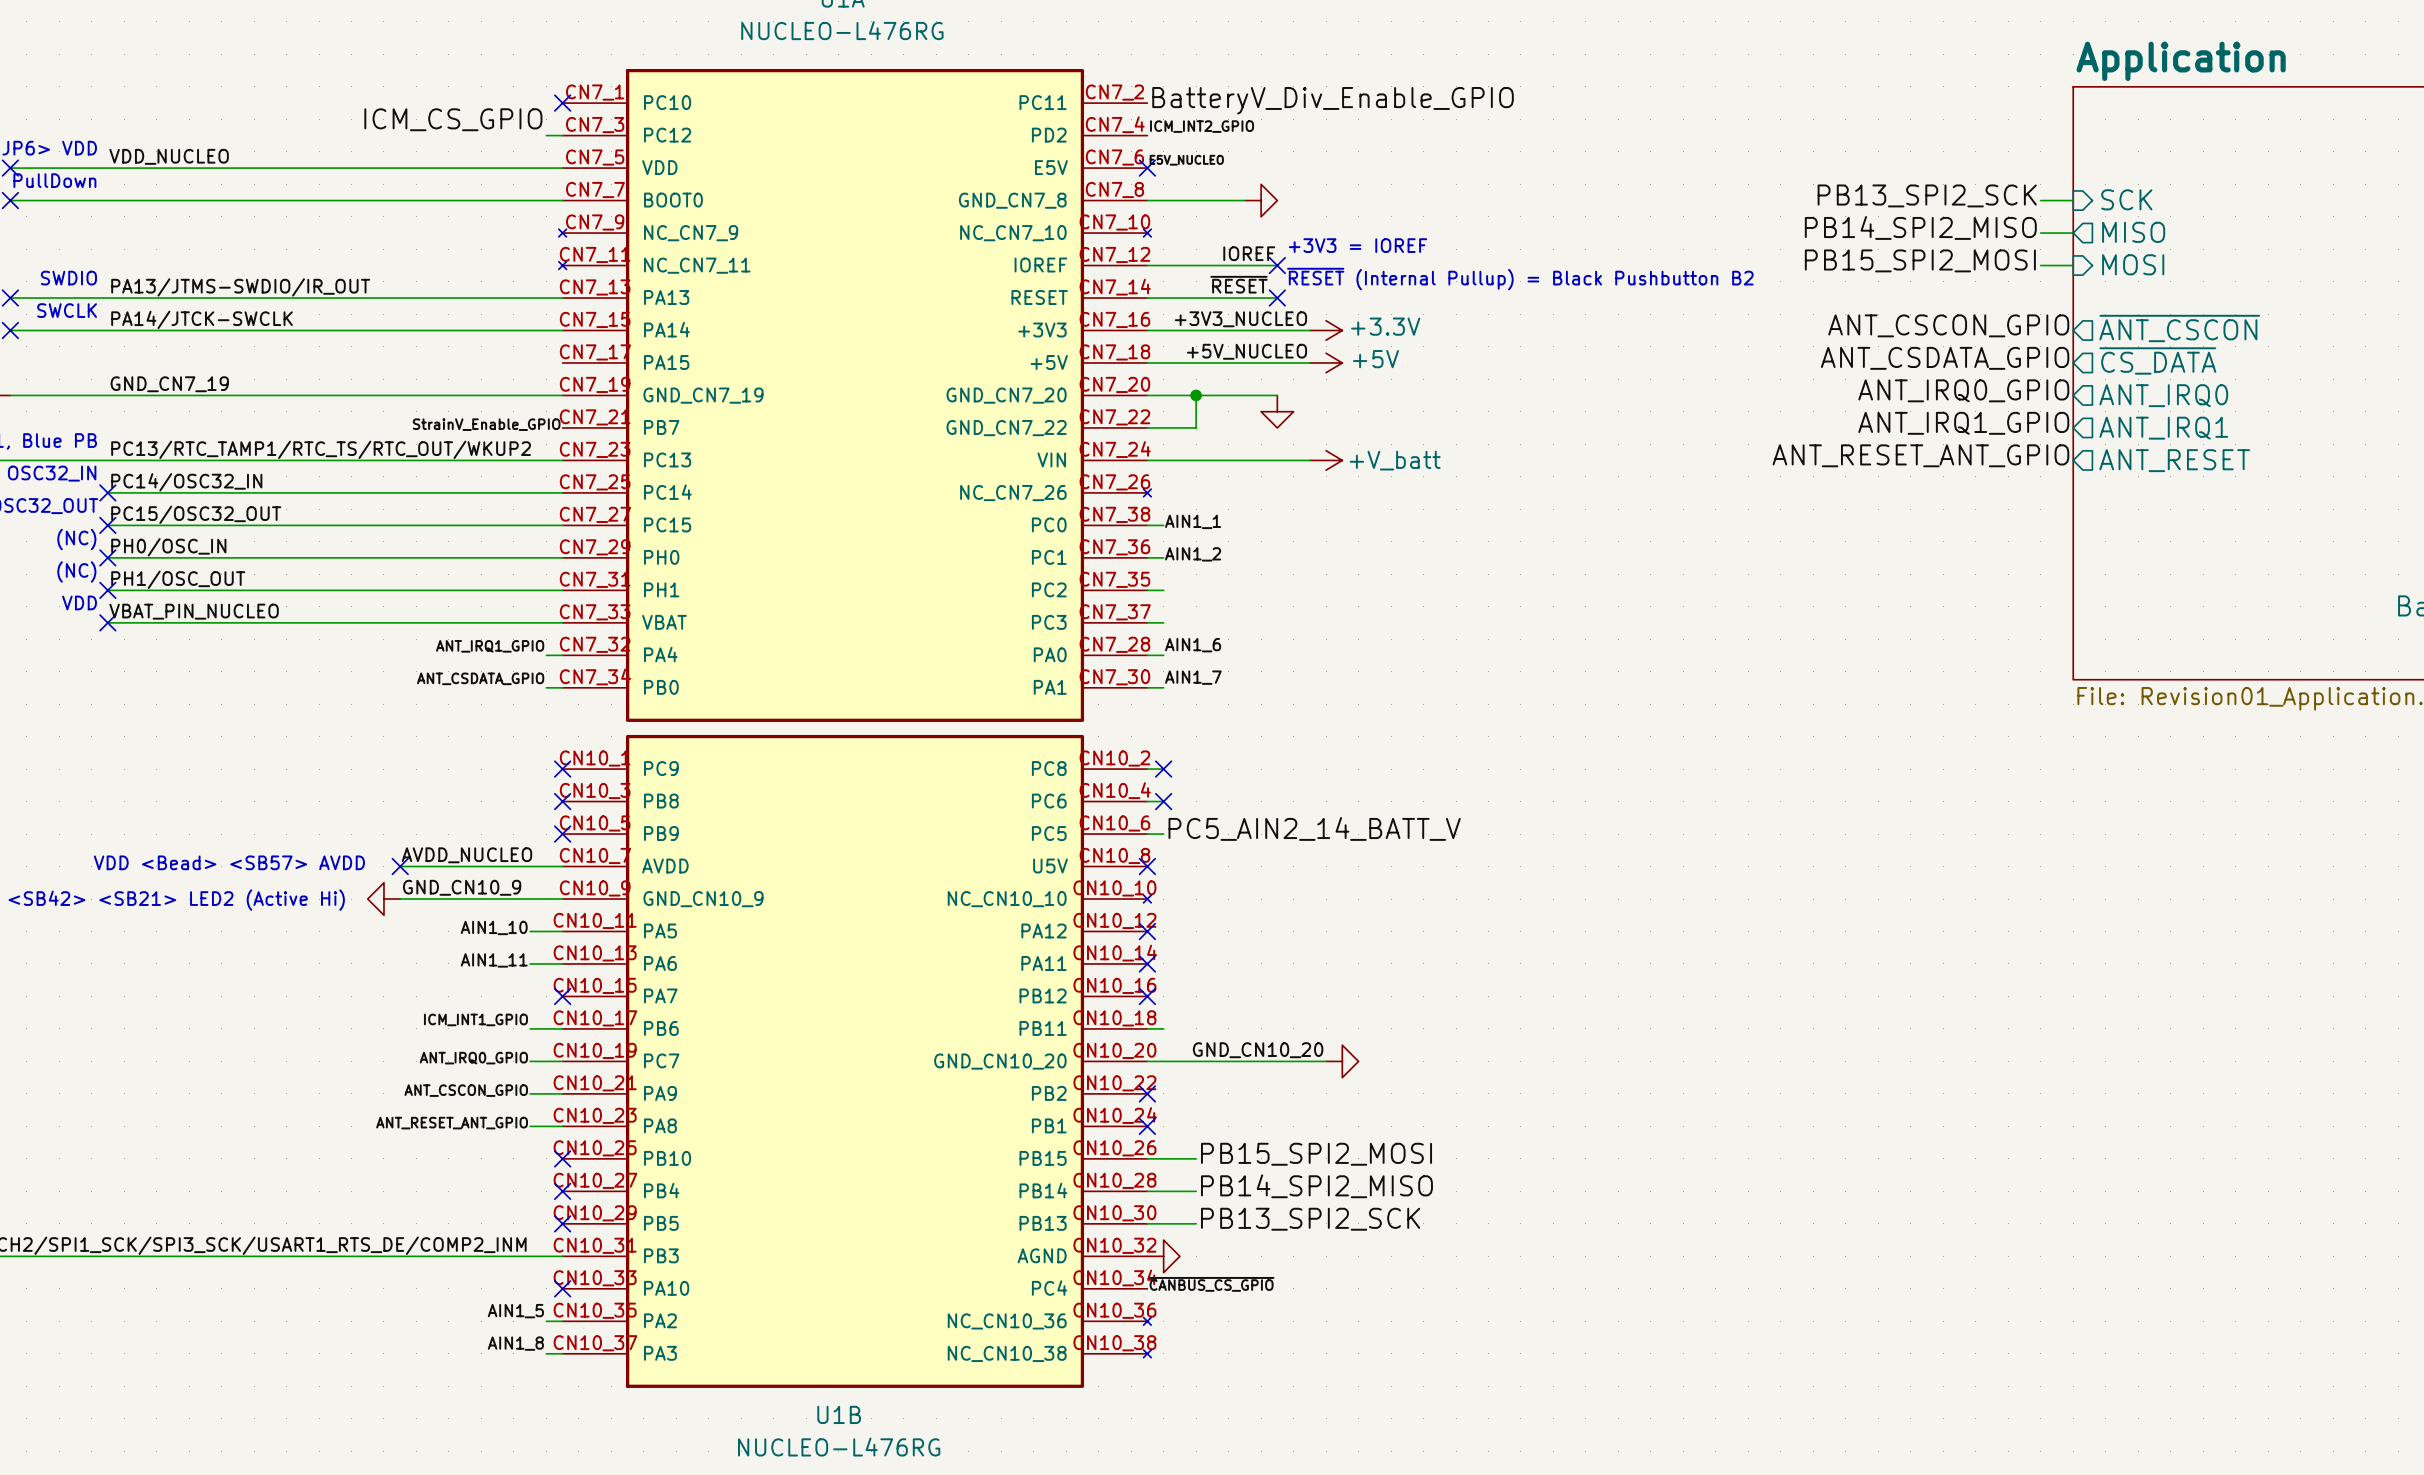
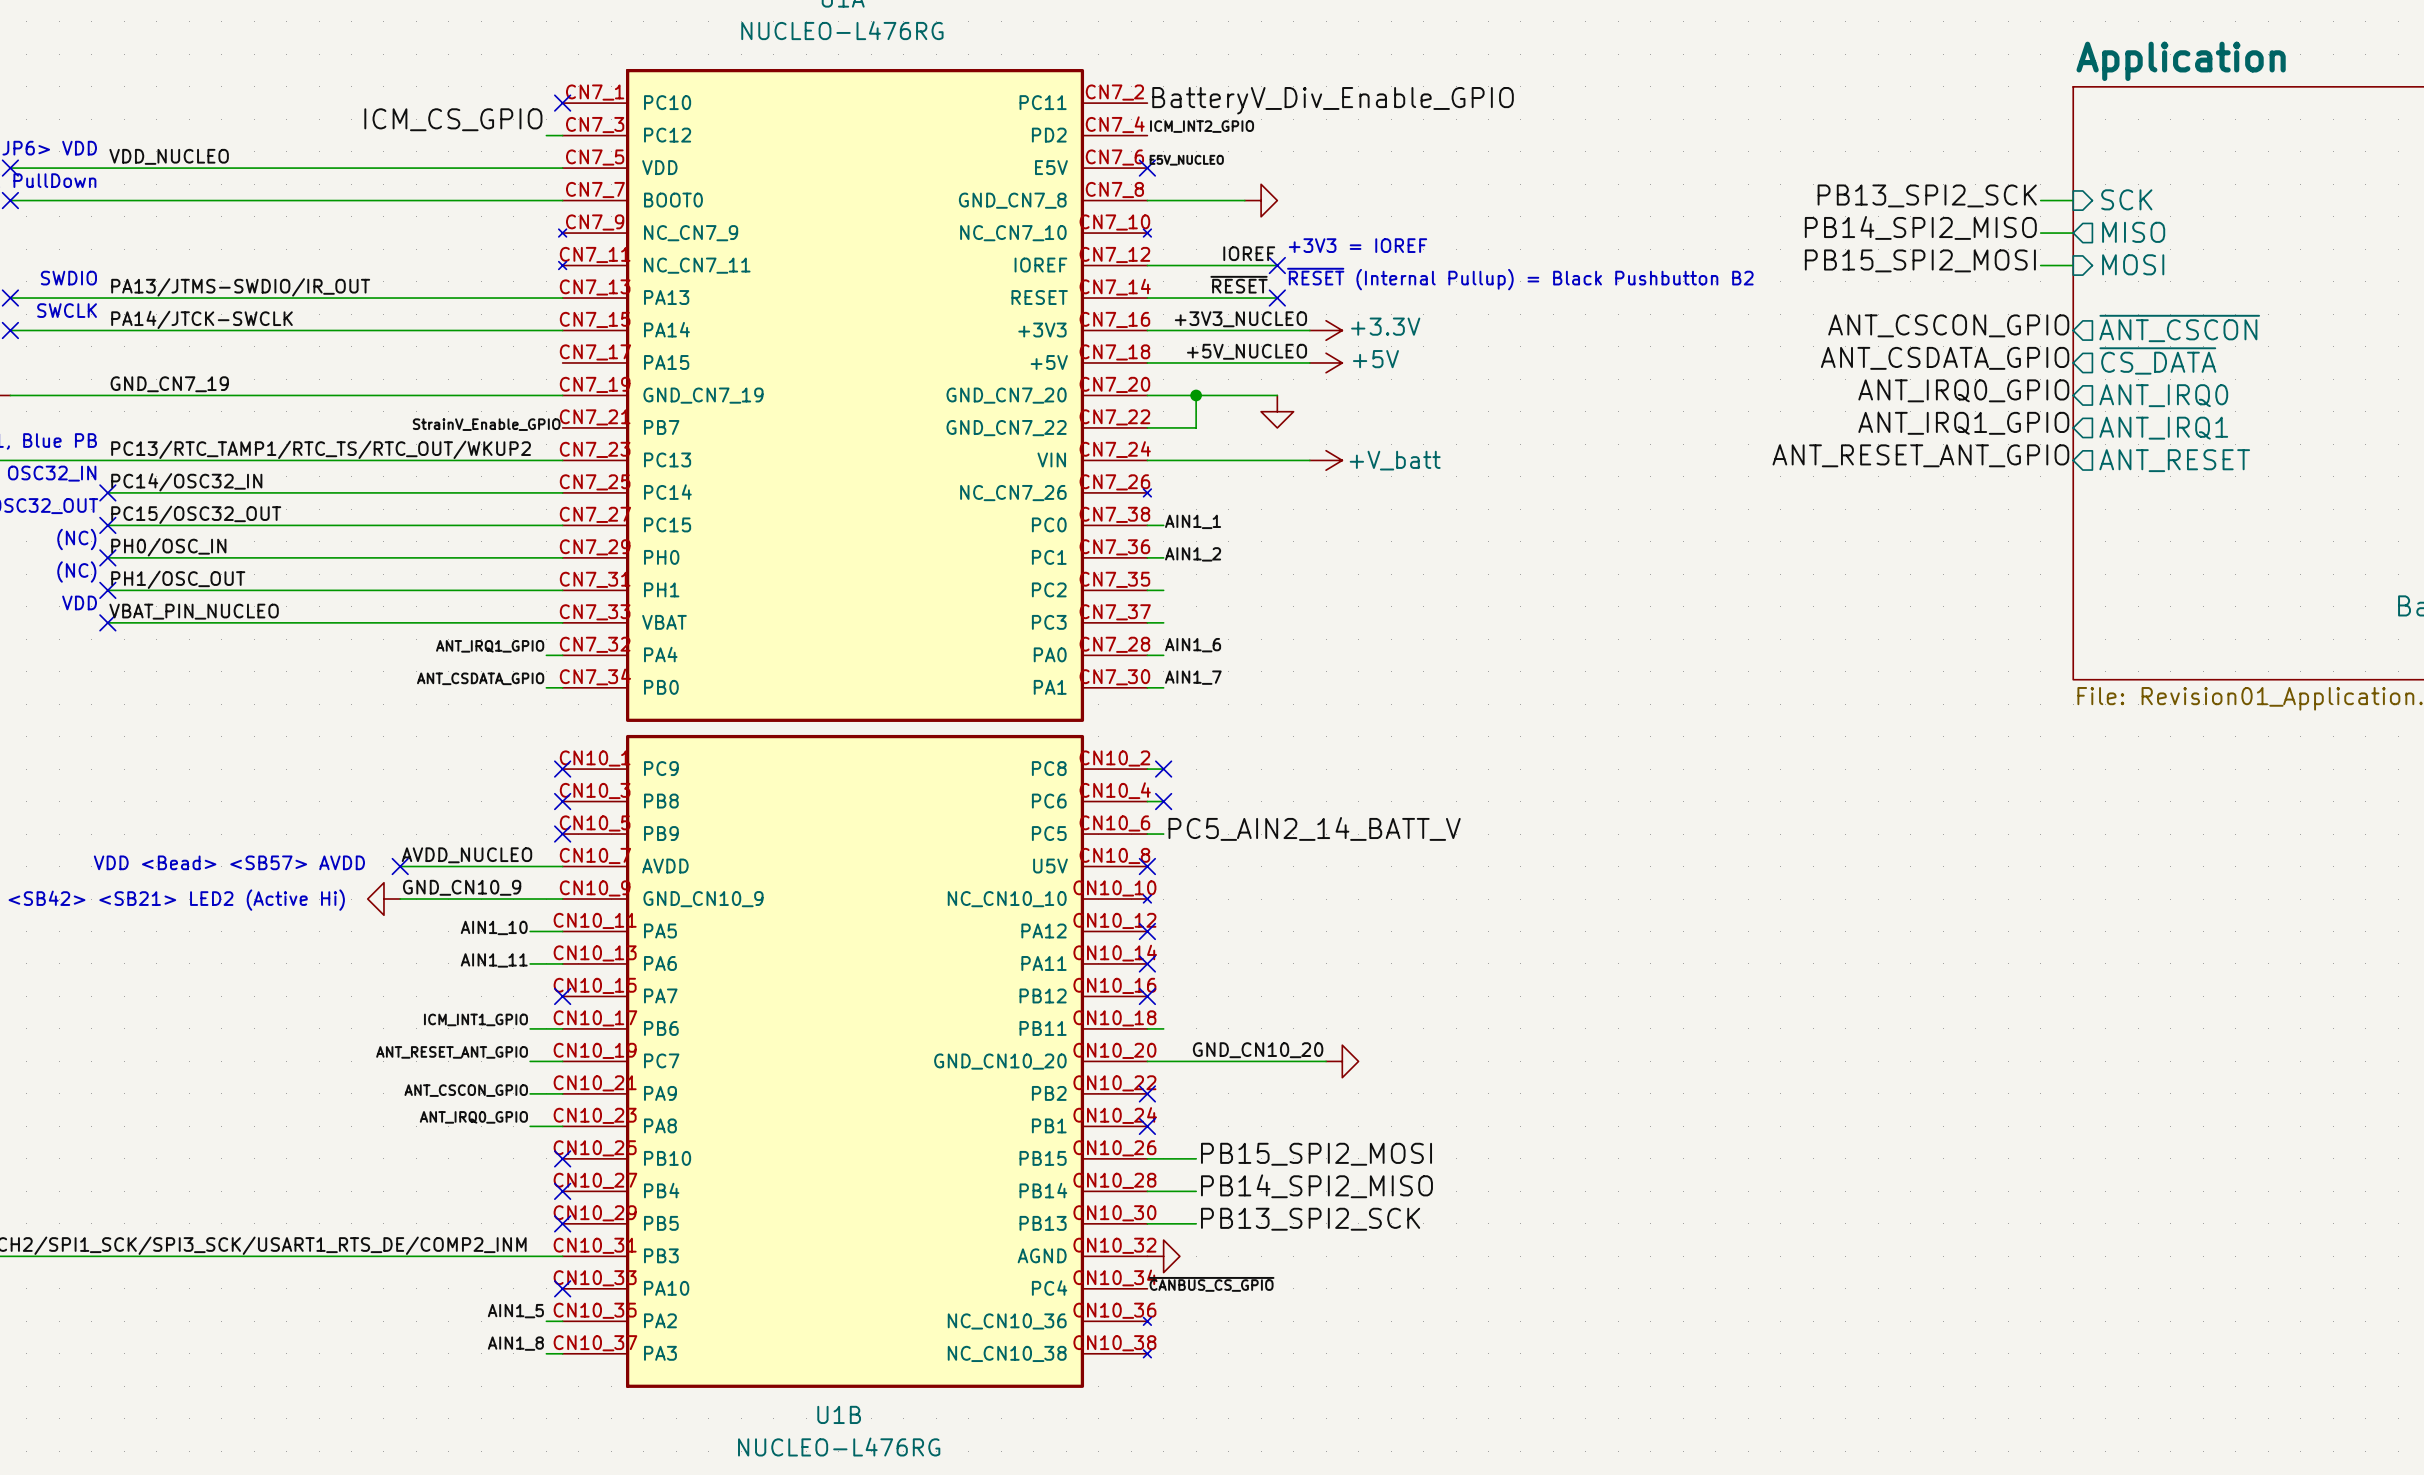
label: ANT_IRQ0_GPIO (473, 1058) -> ANT_RESET_ANT_GPIO (452, 1052)
label: ANT_RESET_ANT_GPIO (452, 1123) -> ANT_IRQ0_GPIO (473, 1117)

